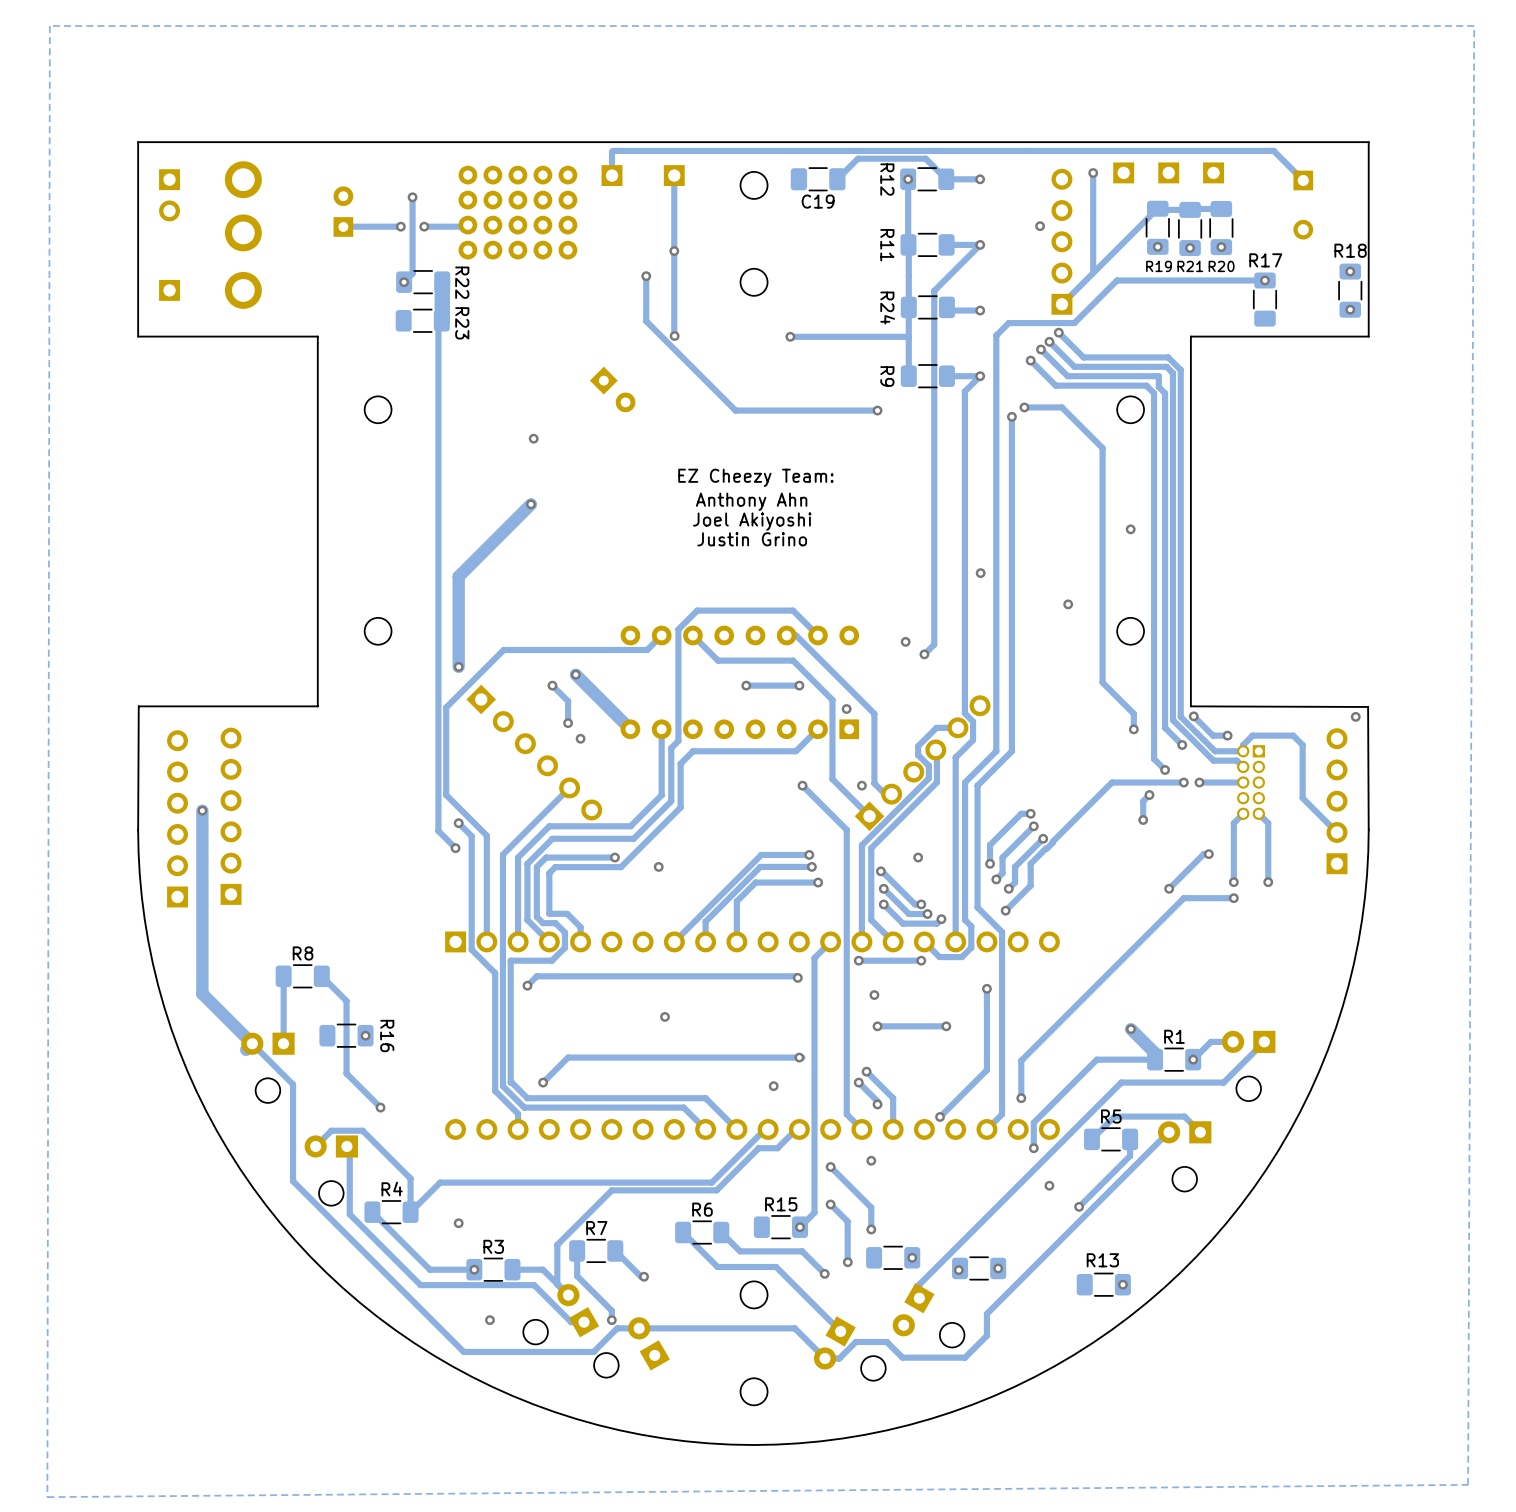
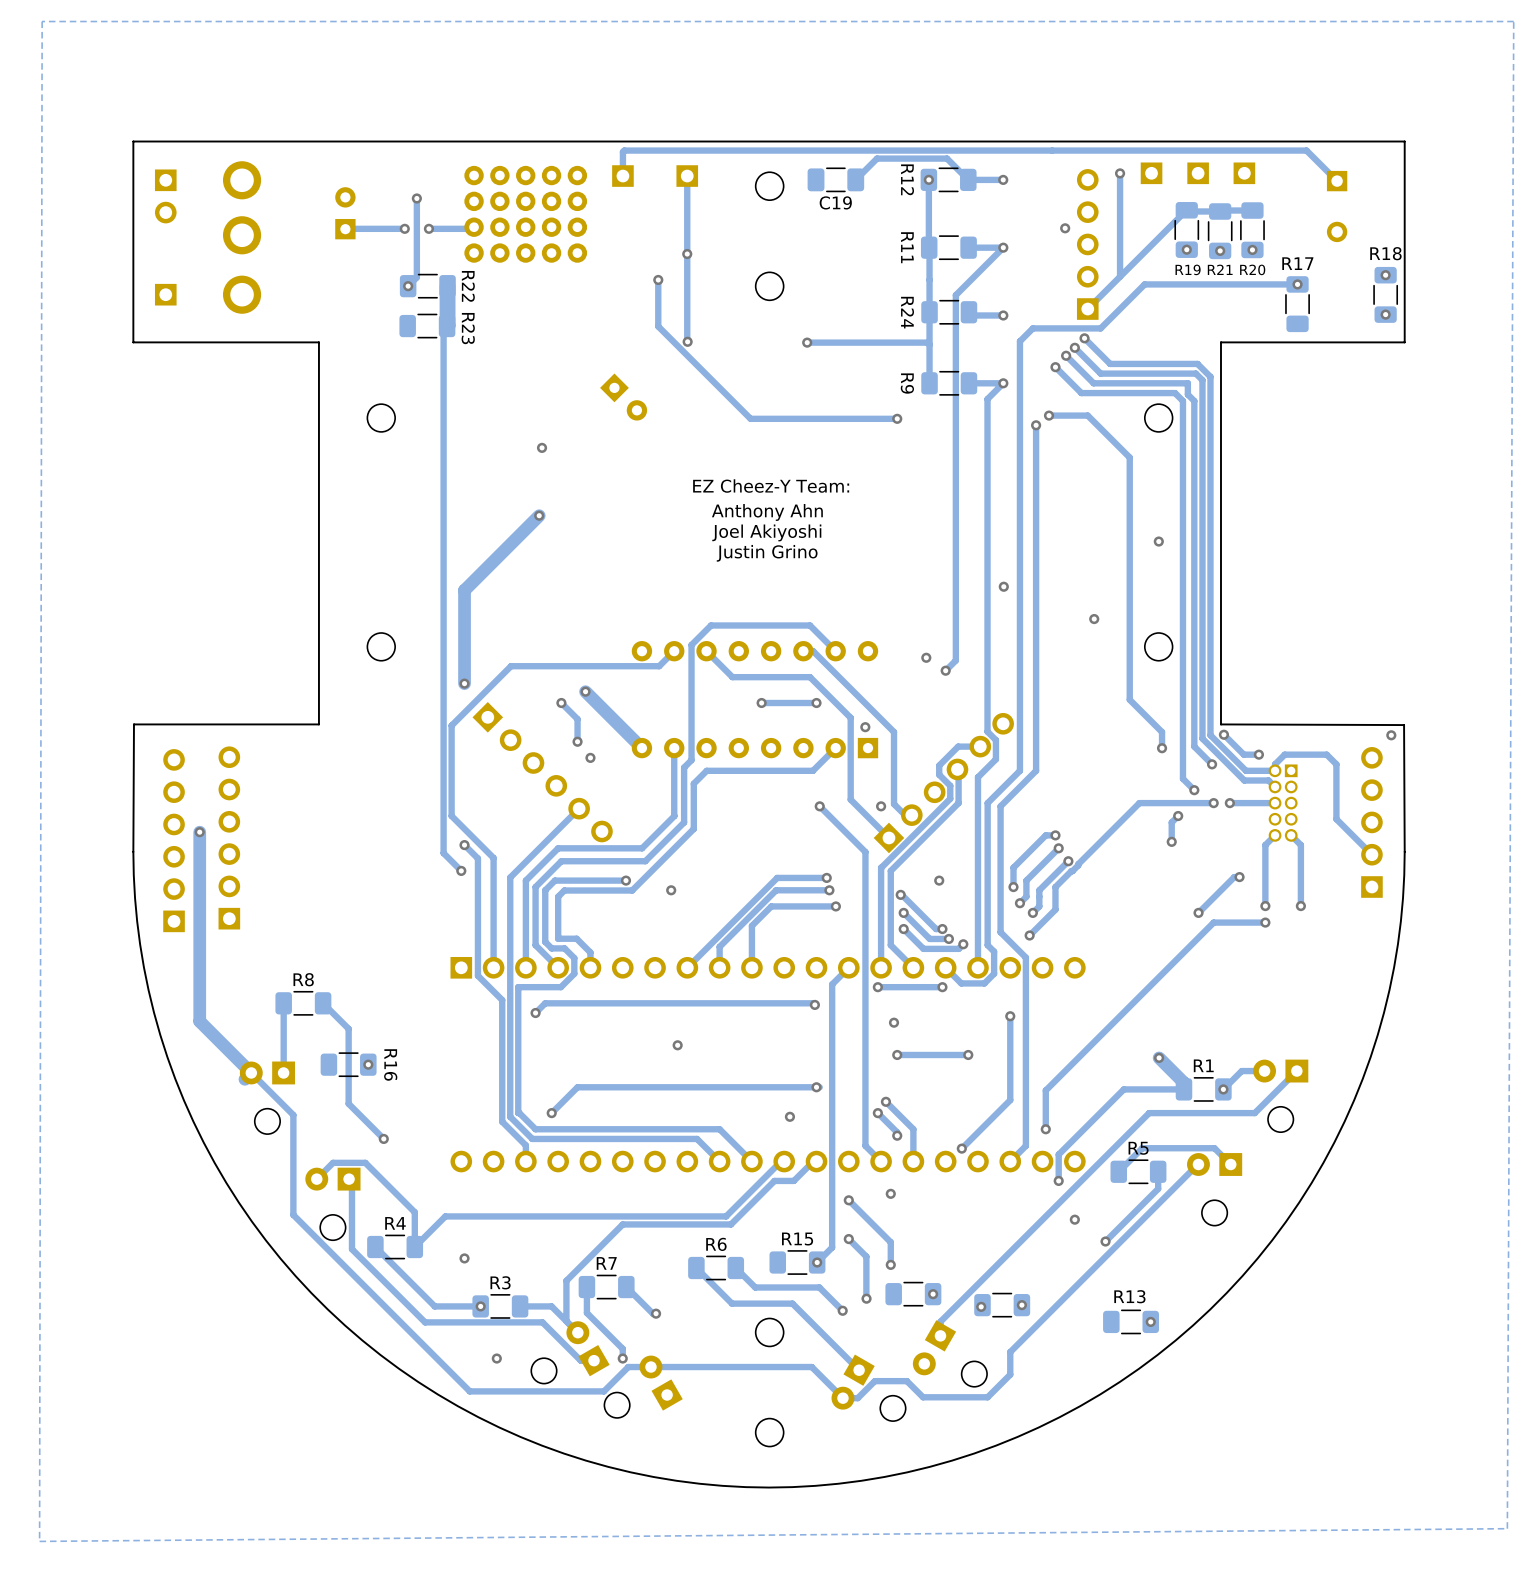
text: EZ Cheezy Team: (755, 477) -> EZ Cheez-Y Team: (771, 486)

